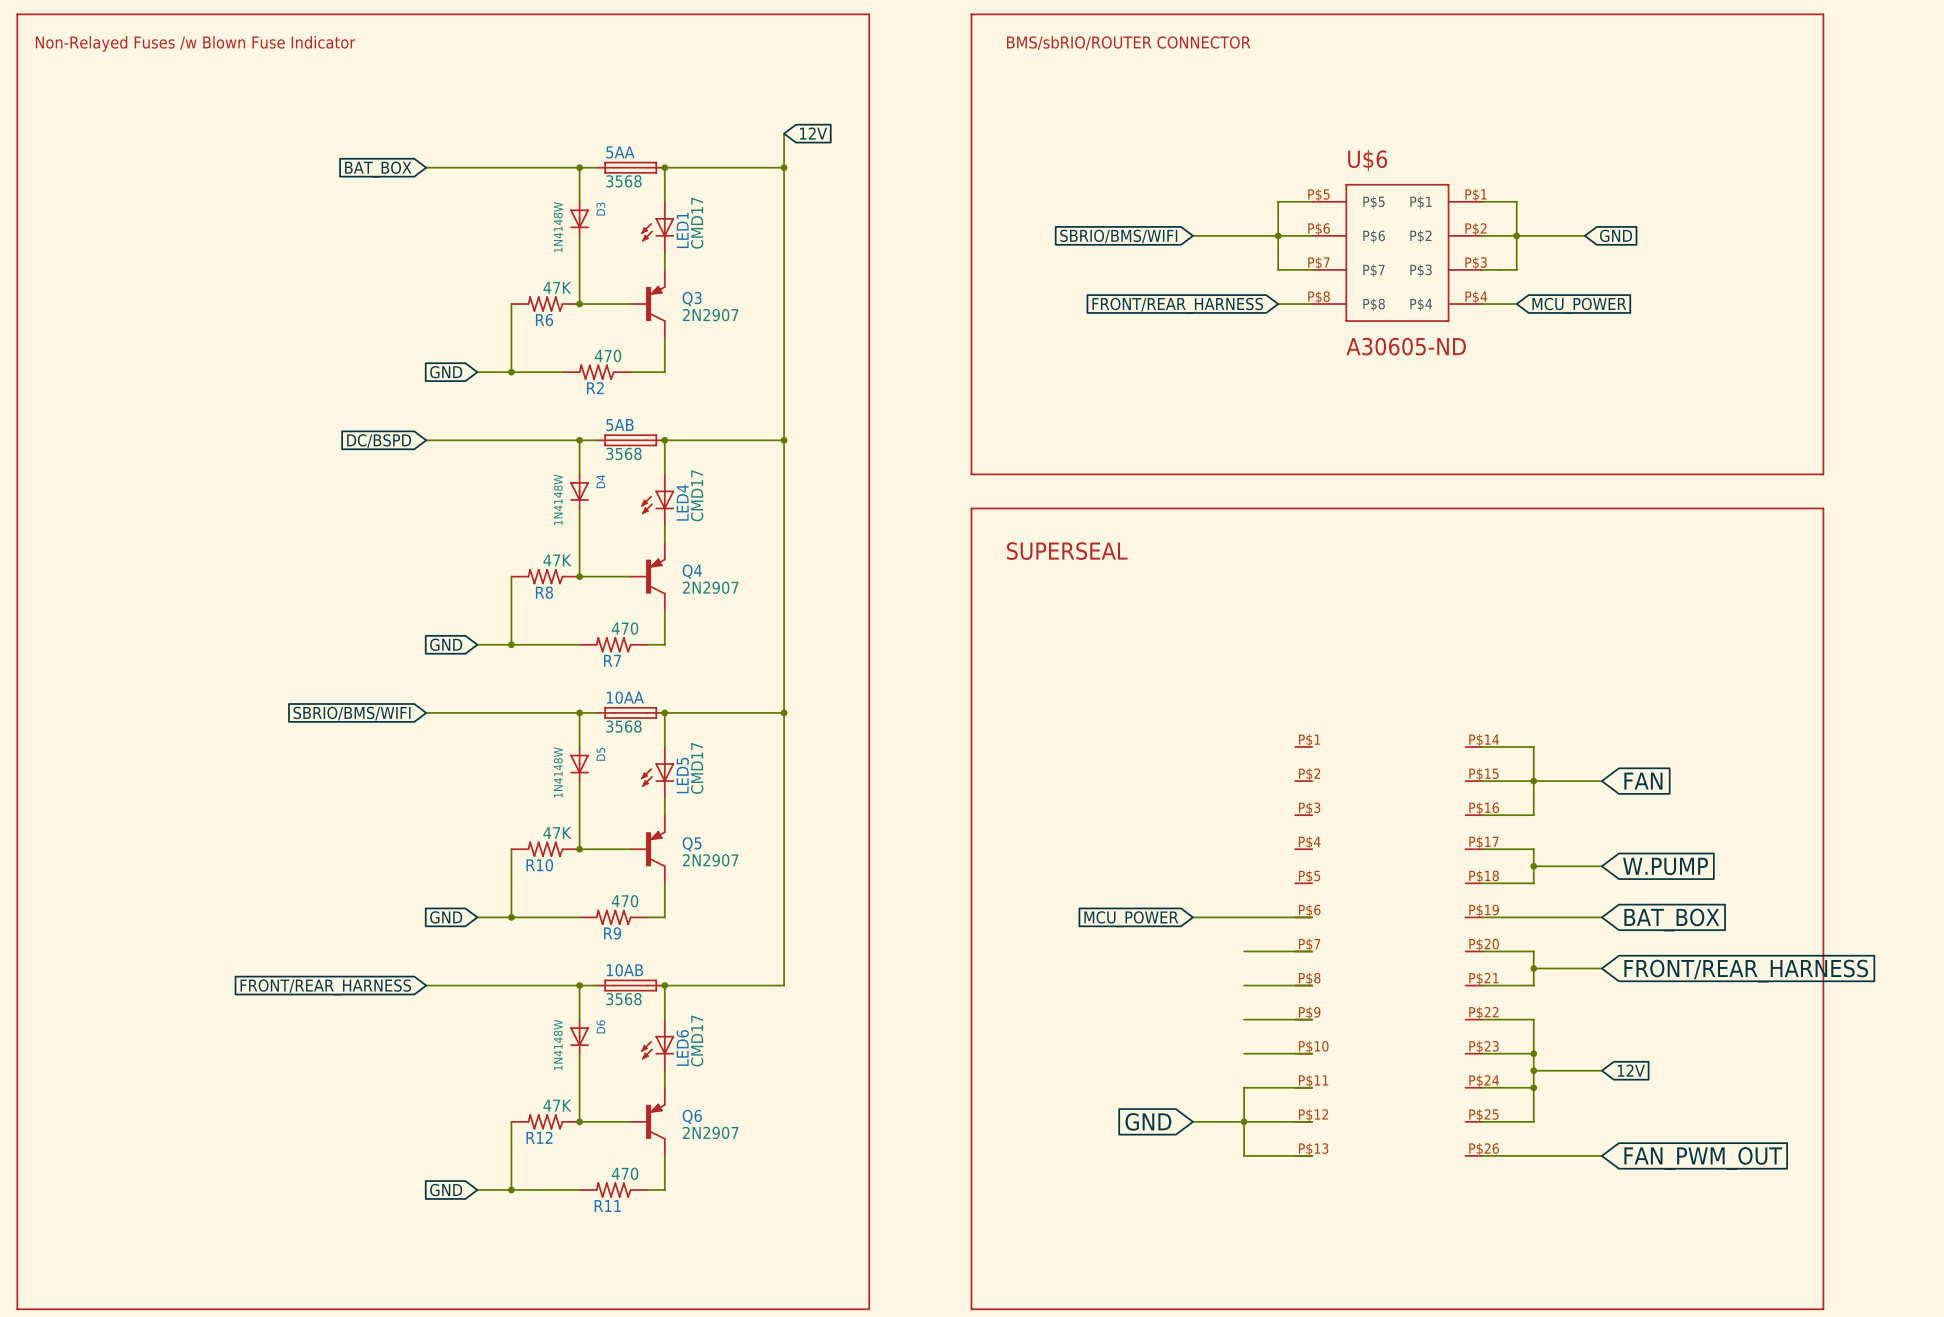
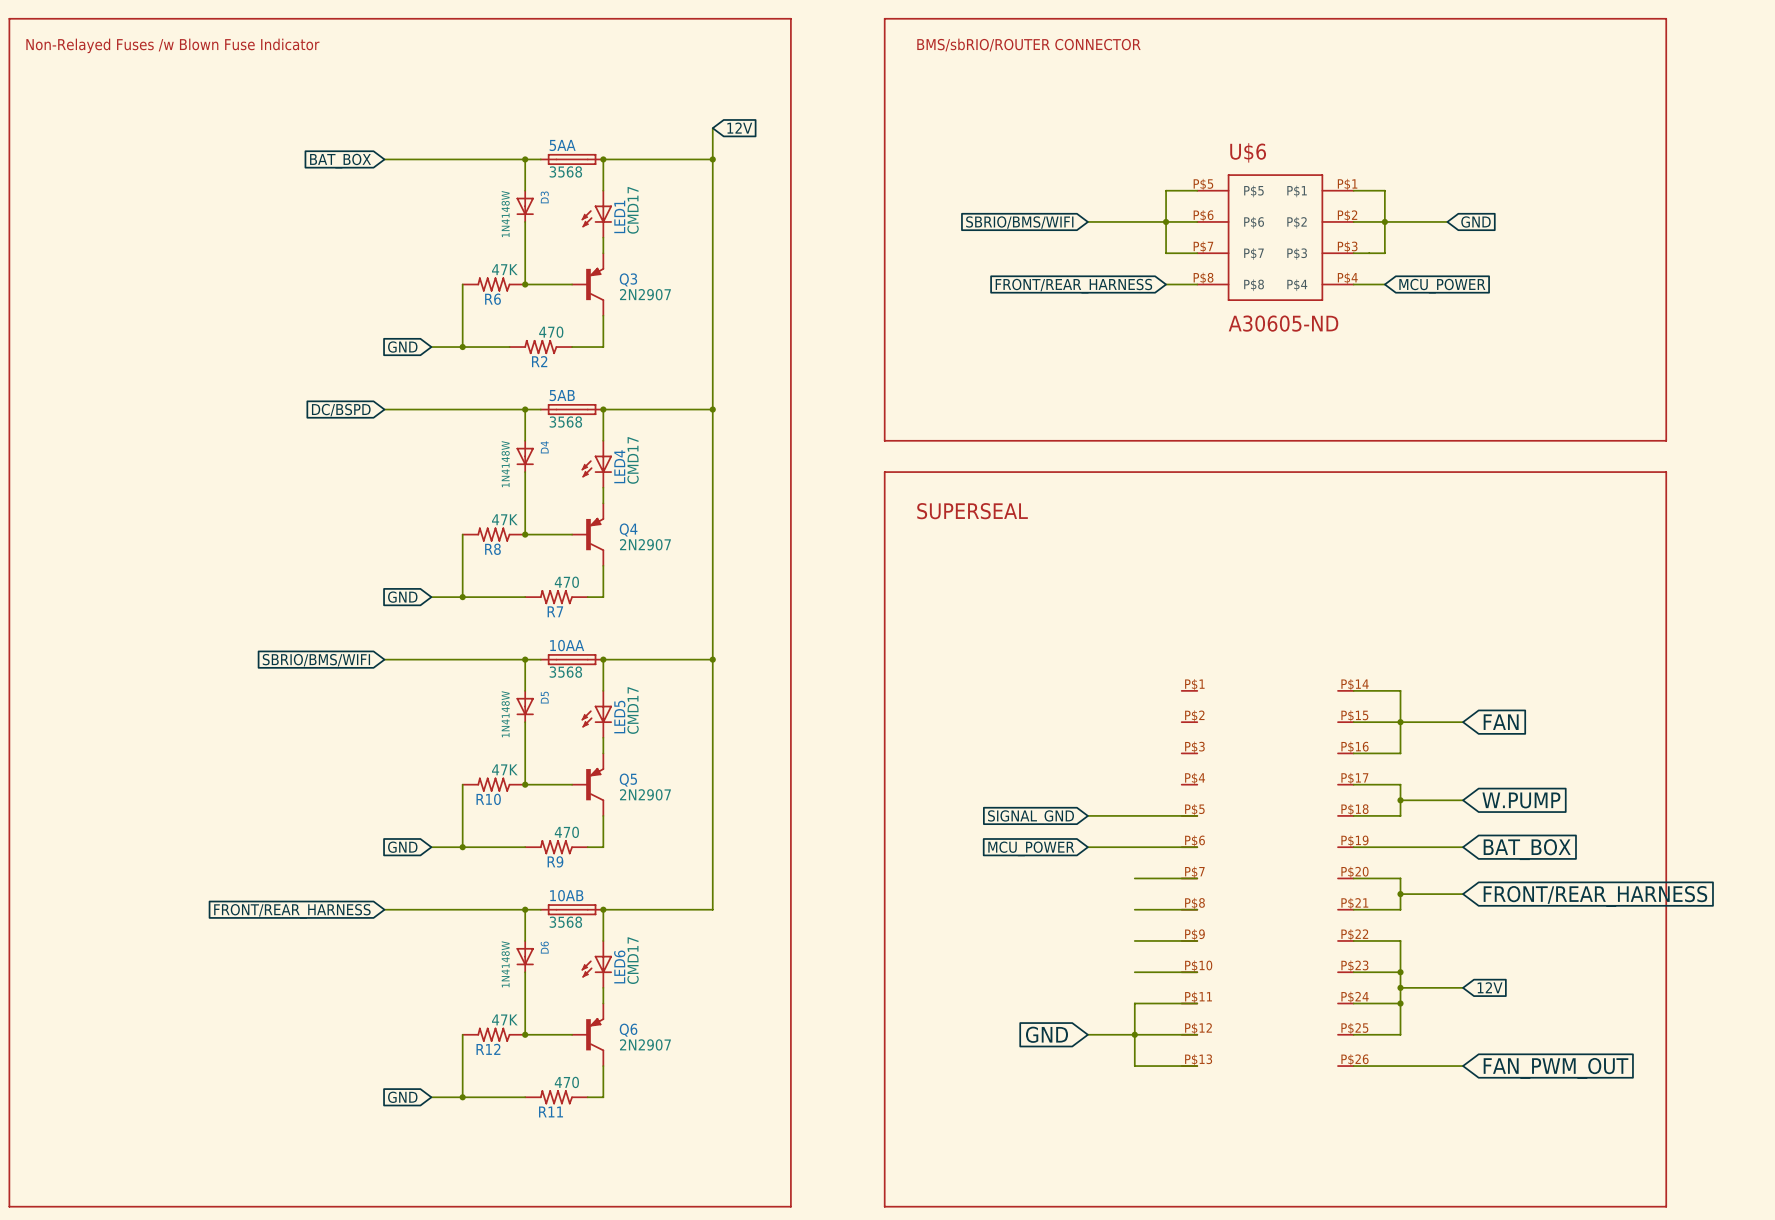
wire: none -> (1087, 815) (1197, 815)
global label: none -> SIGNAL_GND (1031, 817)

